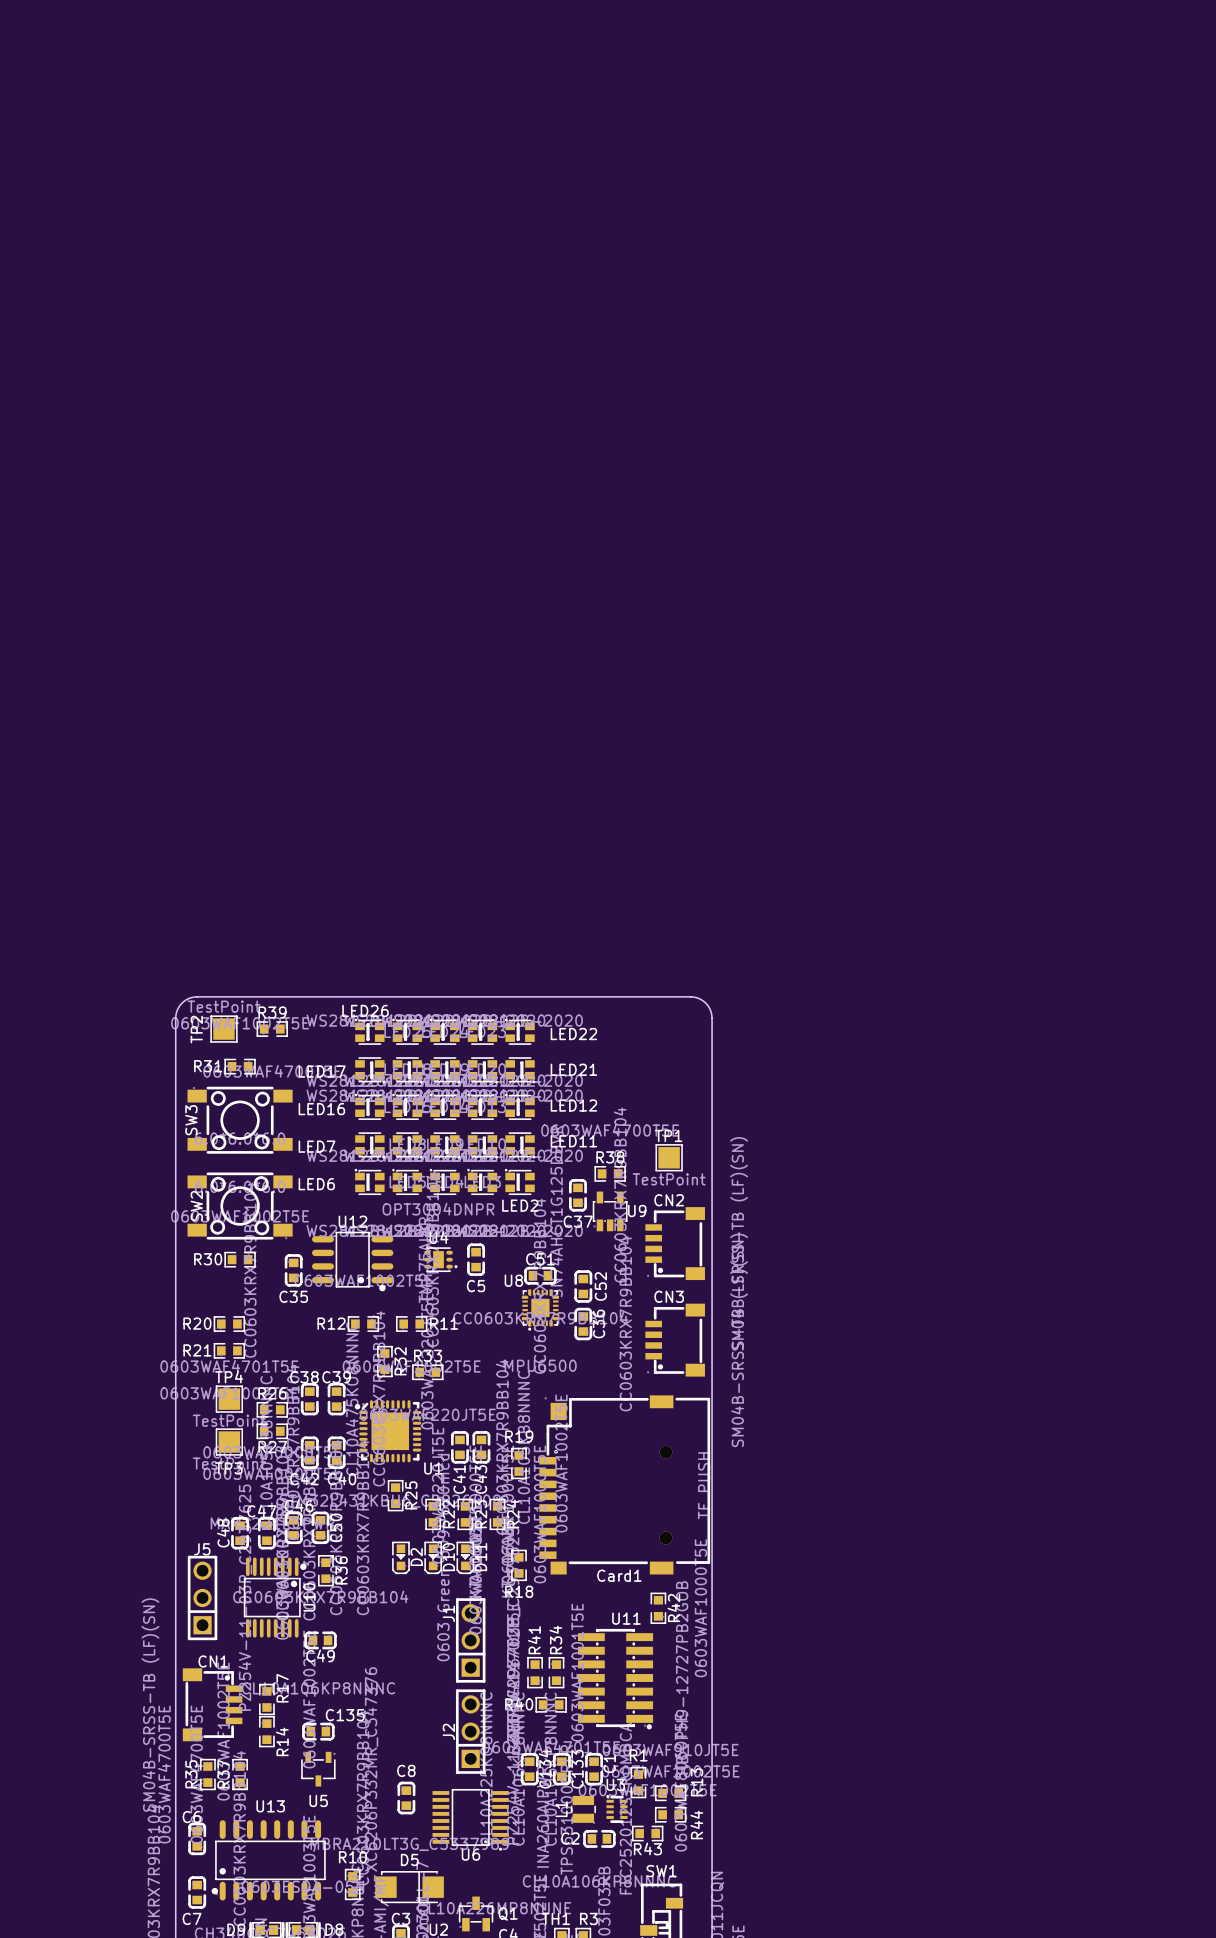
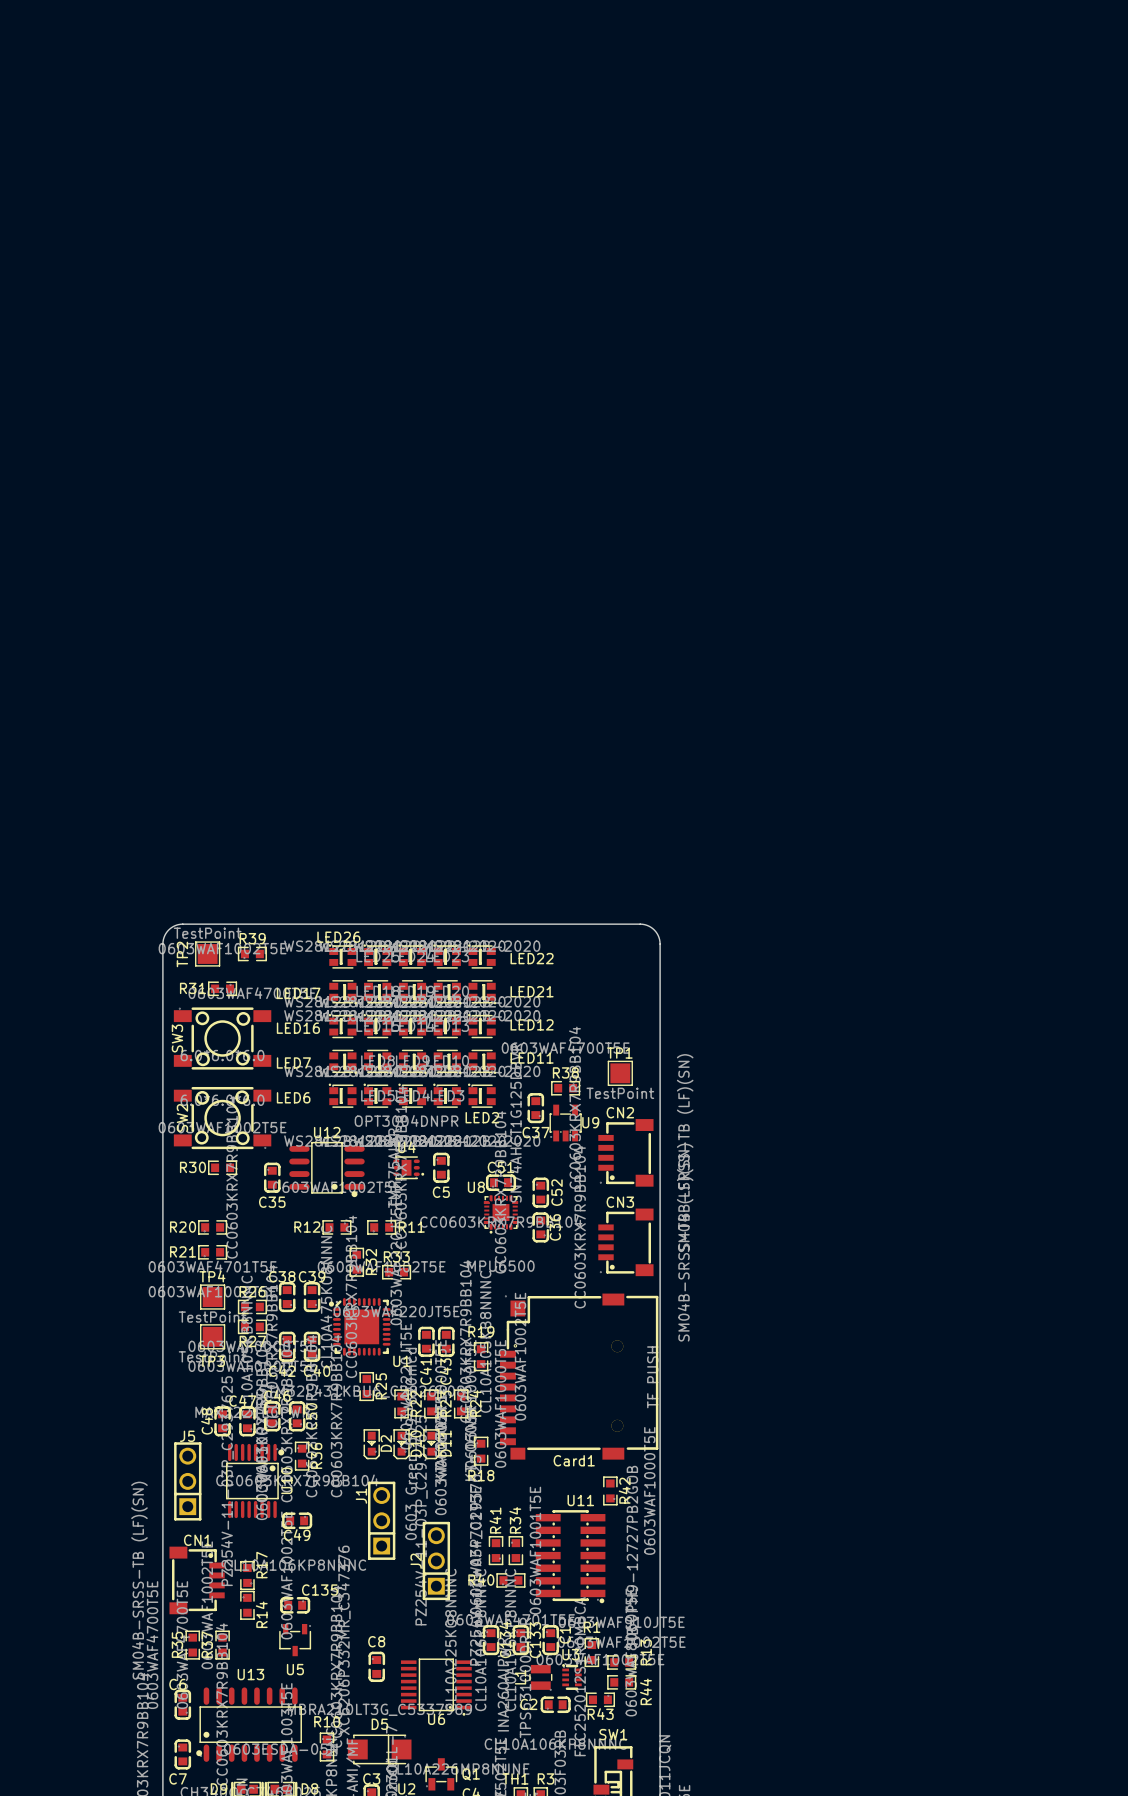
J1 position: (470, 1640) -> (381, 1520)
J2 position: (470, 1731) -> (436, 1560)

